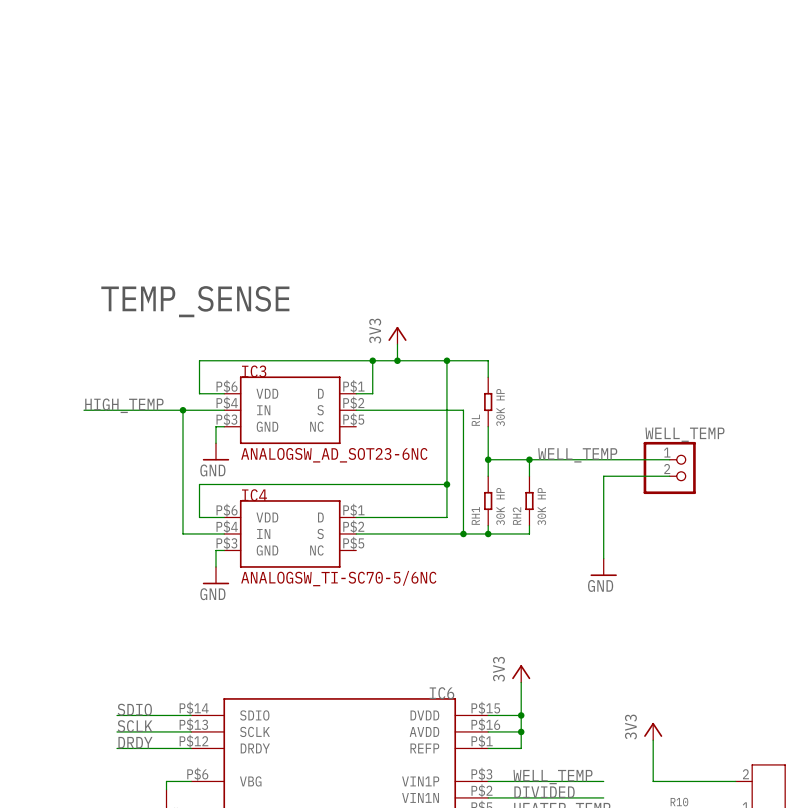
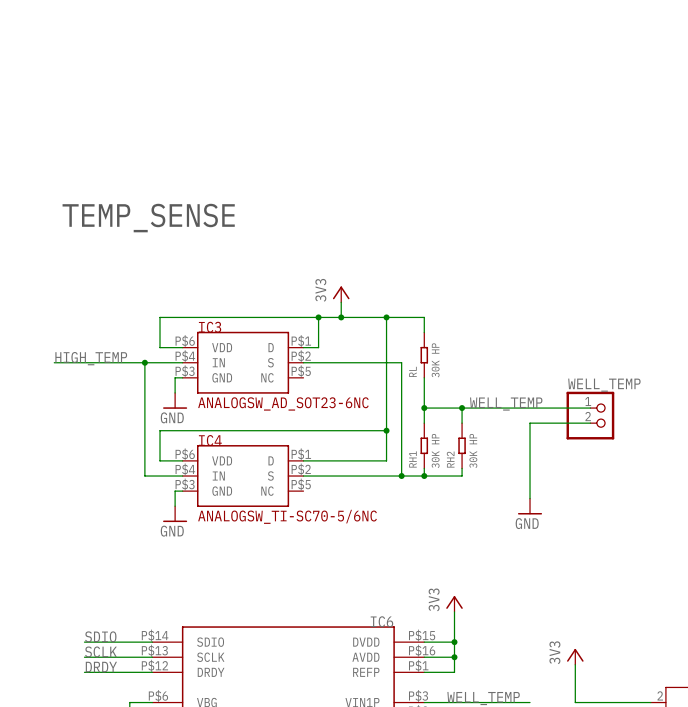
text position: TEMP_SENSE (195, 301) -> TEMP_SENSE (148, 218)

